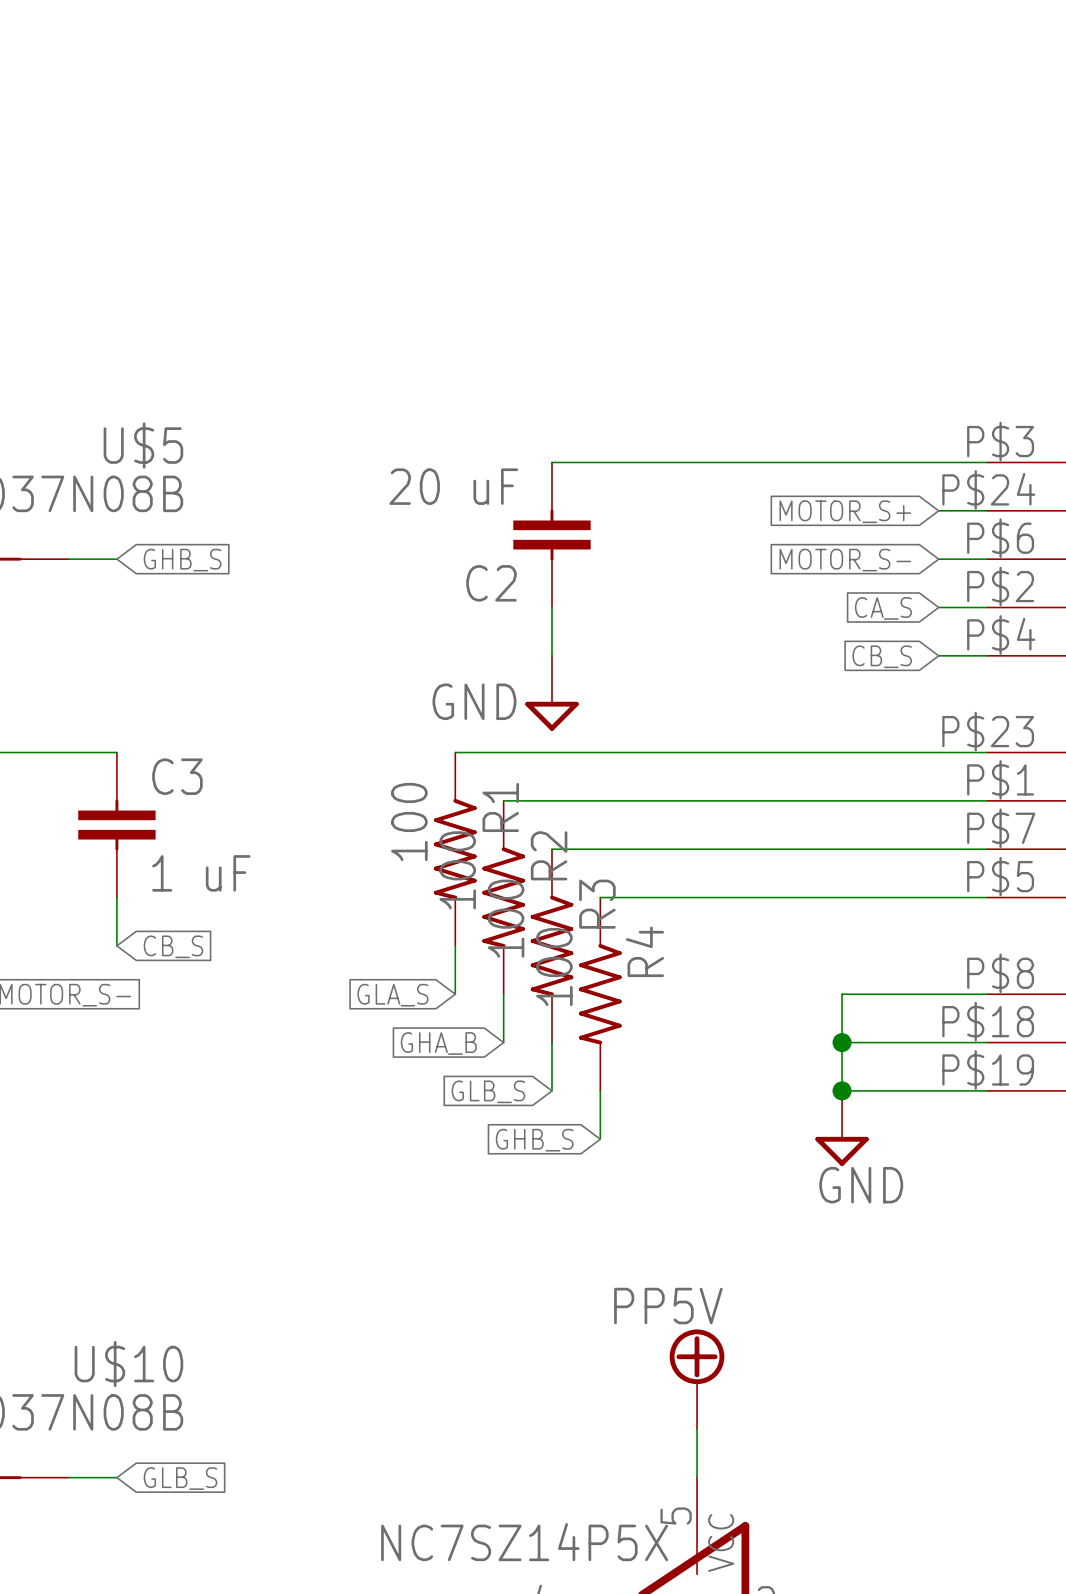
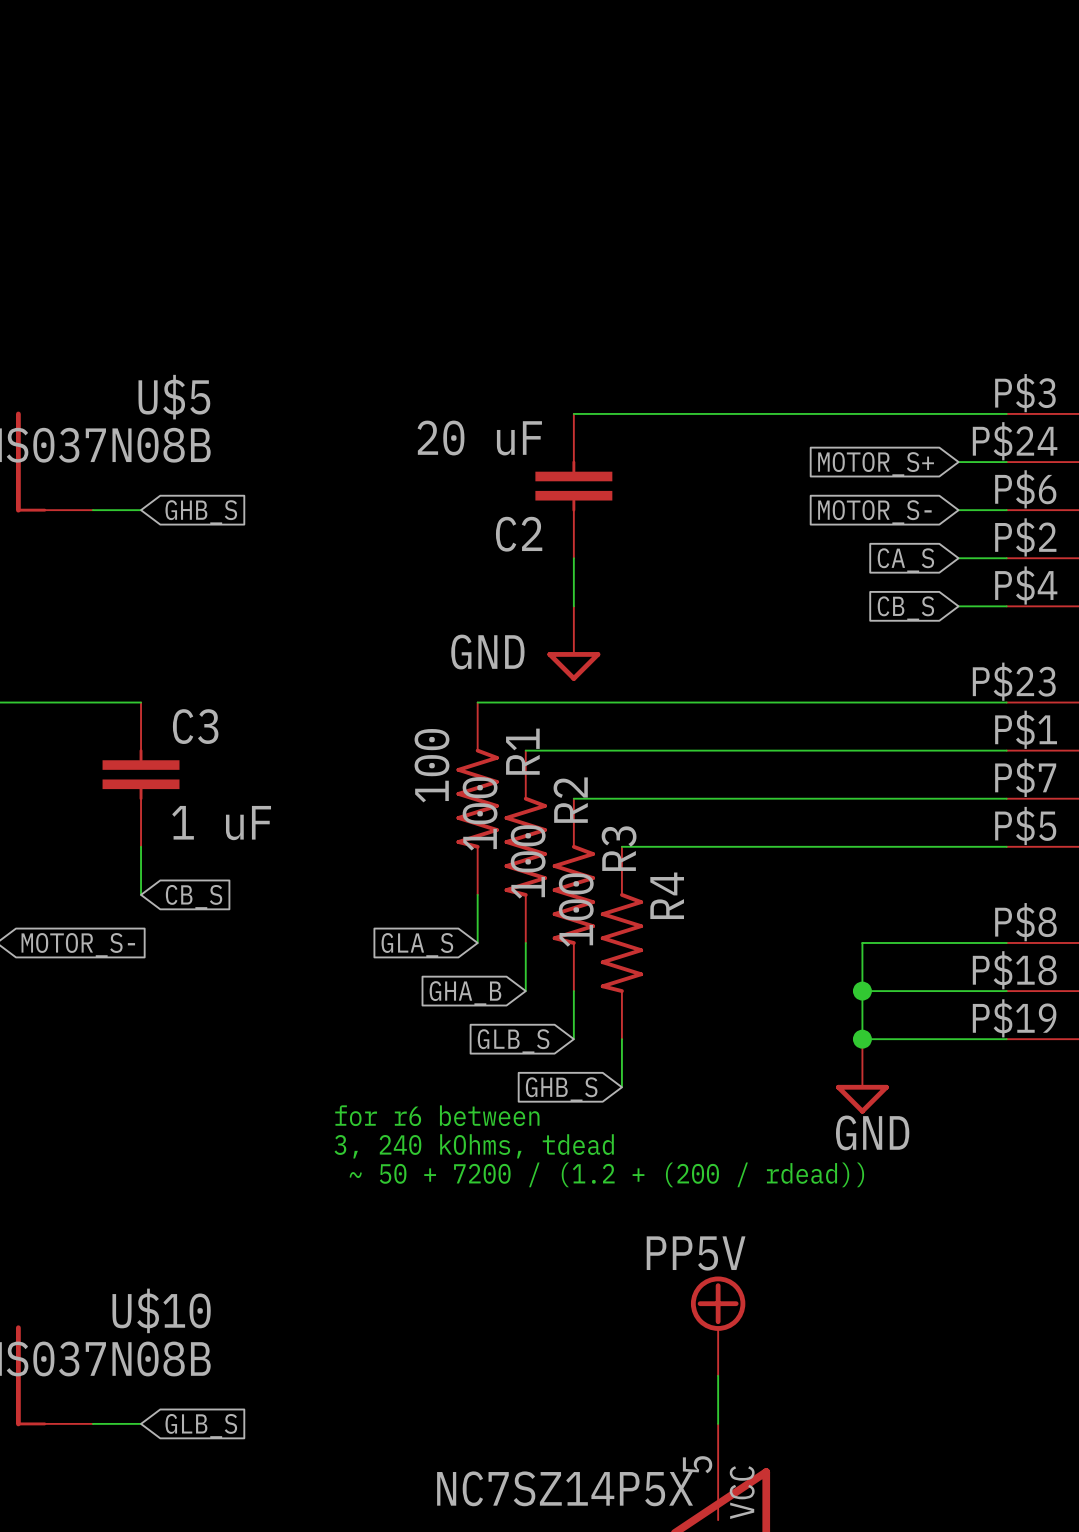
text: none -> for r6 between (437, 1115)
text: none -> 3, 240 kOhms, tdead (474, 1146)
text: none -> ~ 50 + 7200 / (1.2 + (200 / rdead)) (606, 1174)

